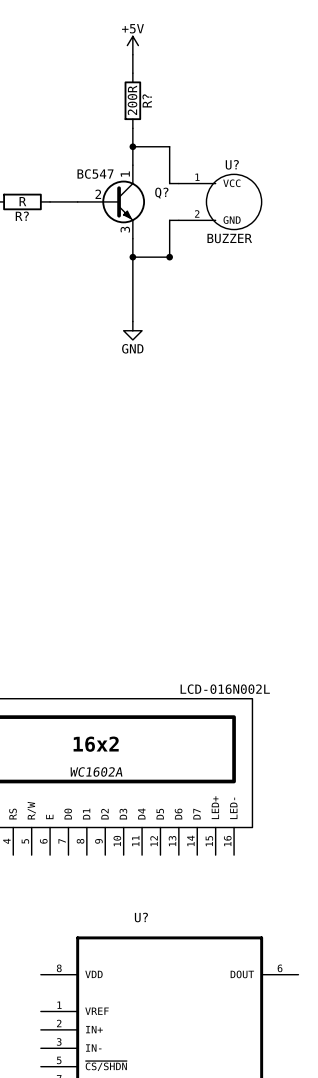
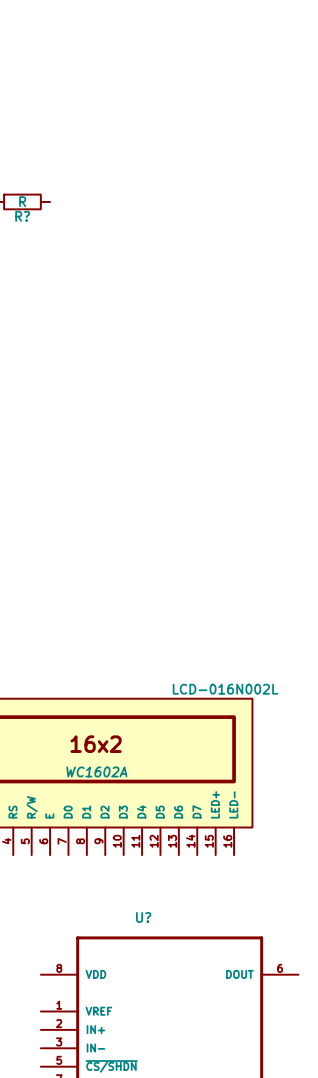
power symbol: +5V (132, 45) -> none
wire: (132, 54) (132, 73) -> none
R?: 200R (132, 100) -> none
wire: (132, 128) (132, 165) -> none
wire: (132, 146) (169, 146) (169, 183) (178, 183) -> none
junction: (132, 146) -> none
wire: (50, 201) (77, 201) -> none
Q?: BC547 (111, 201) -> none
U?: BUZZER (220, 201) -> none
wire: (178, 220) (169, 220) (169, 257) (132, 257) -> none
wire: (132, 238) (132, 321) -> none
junction: (132, 257) -> none
junction: (169, 257) -> none
power symbol: GND (132, 330) -> none

